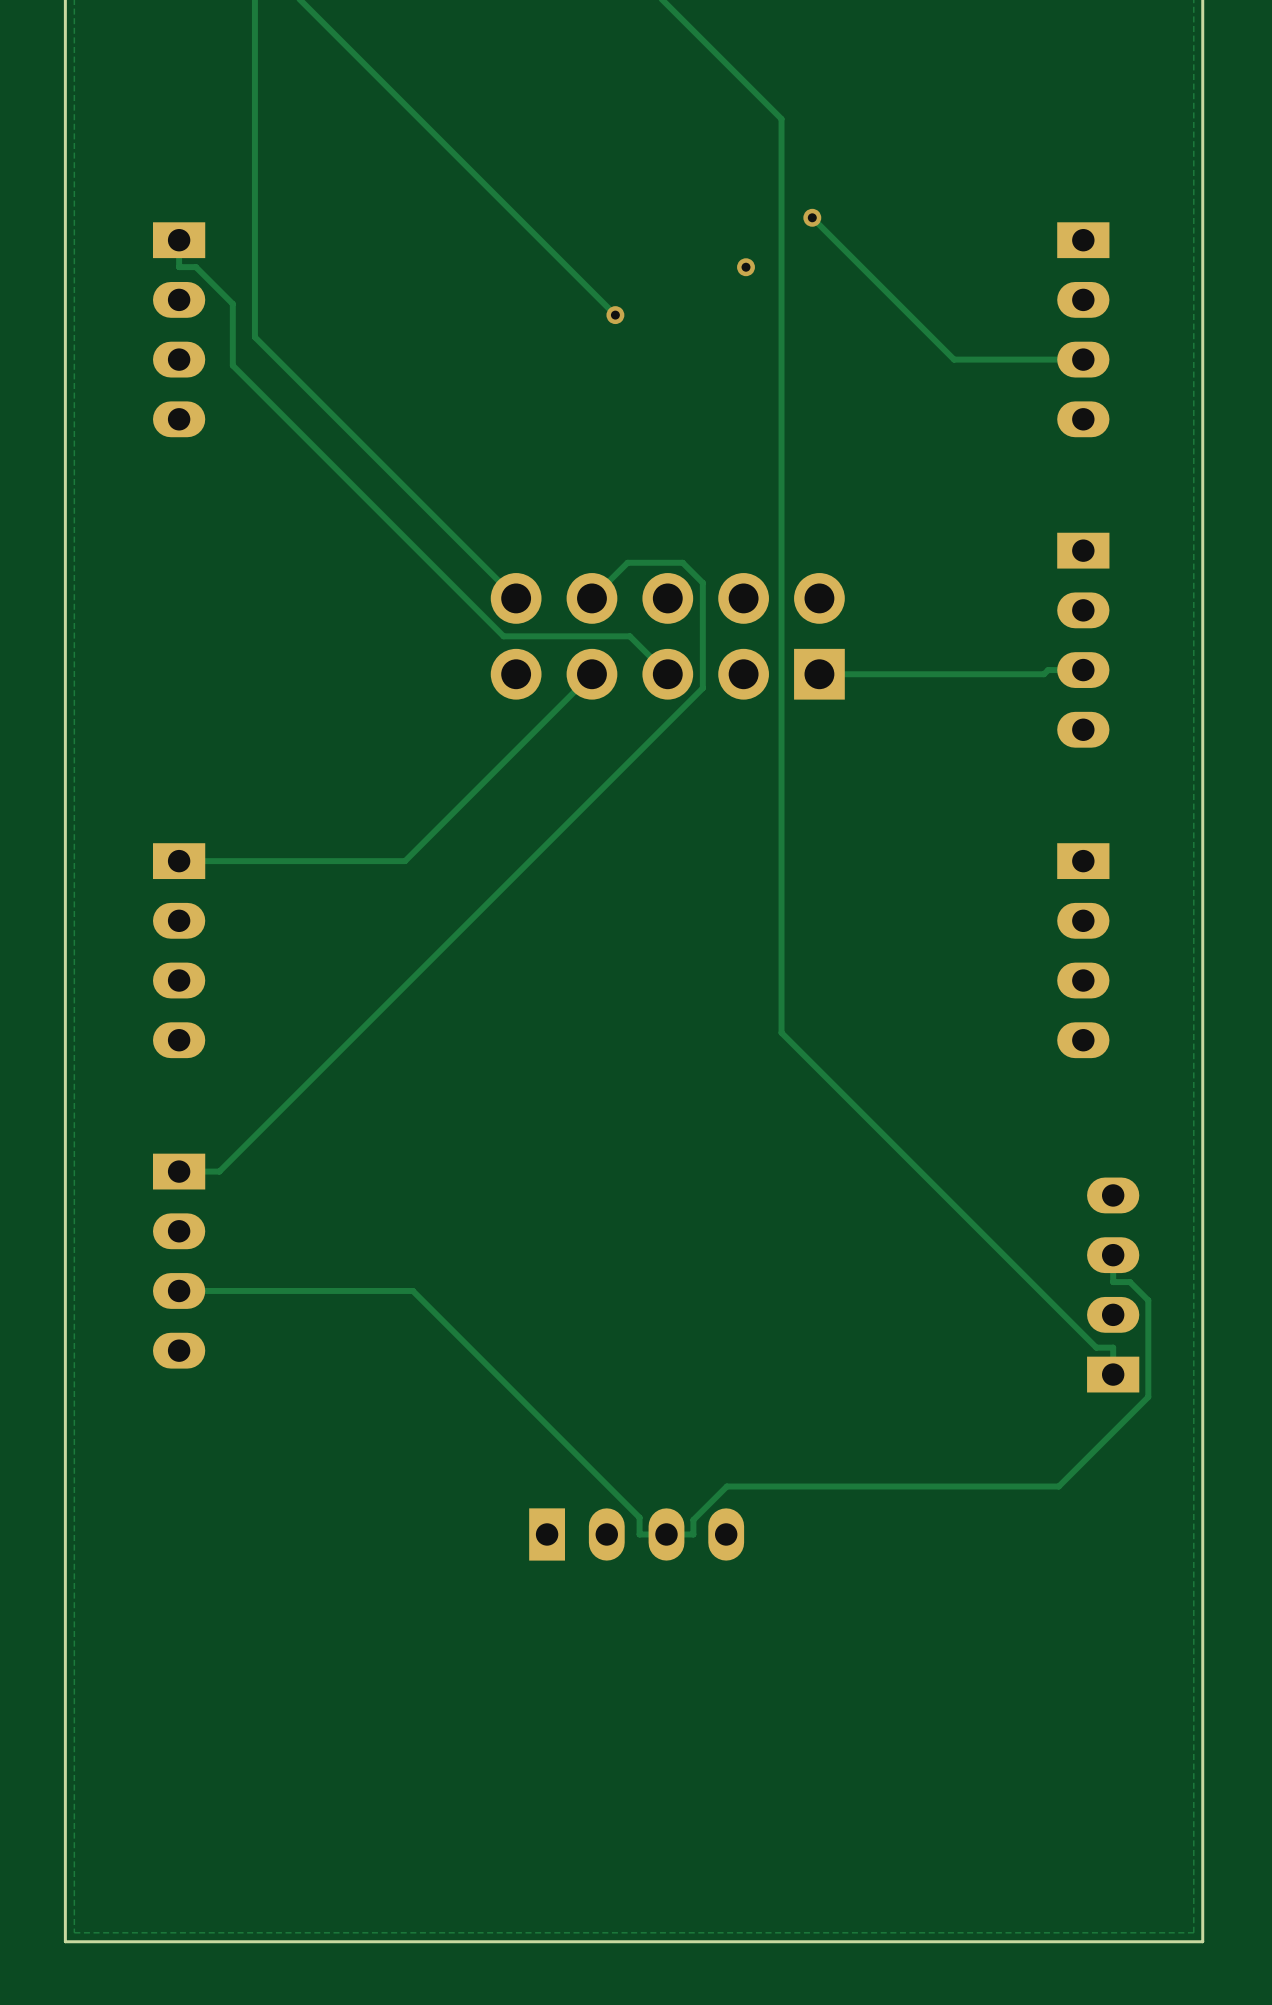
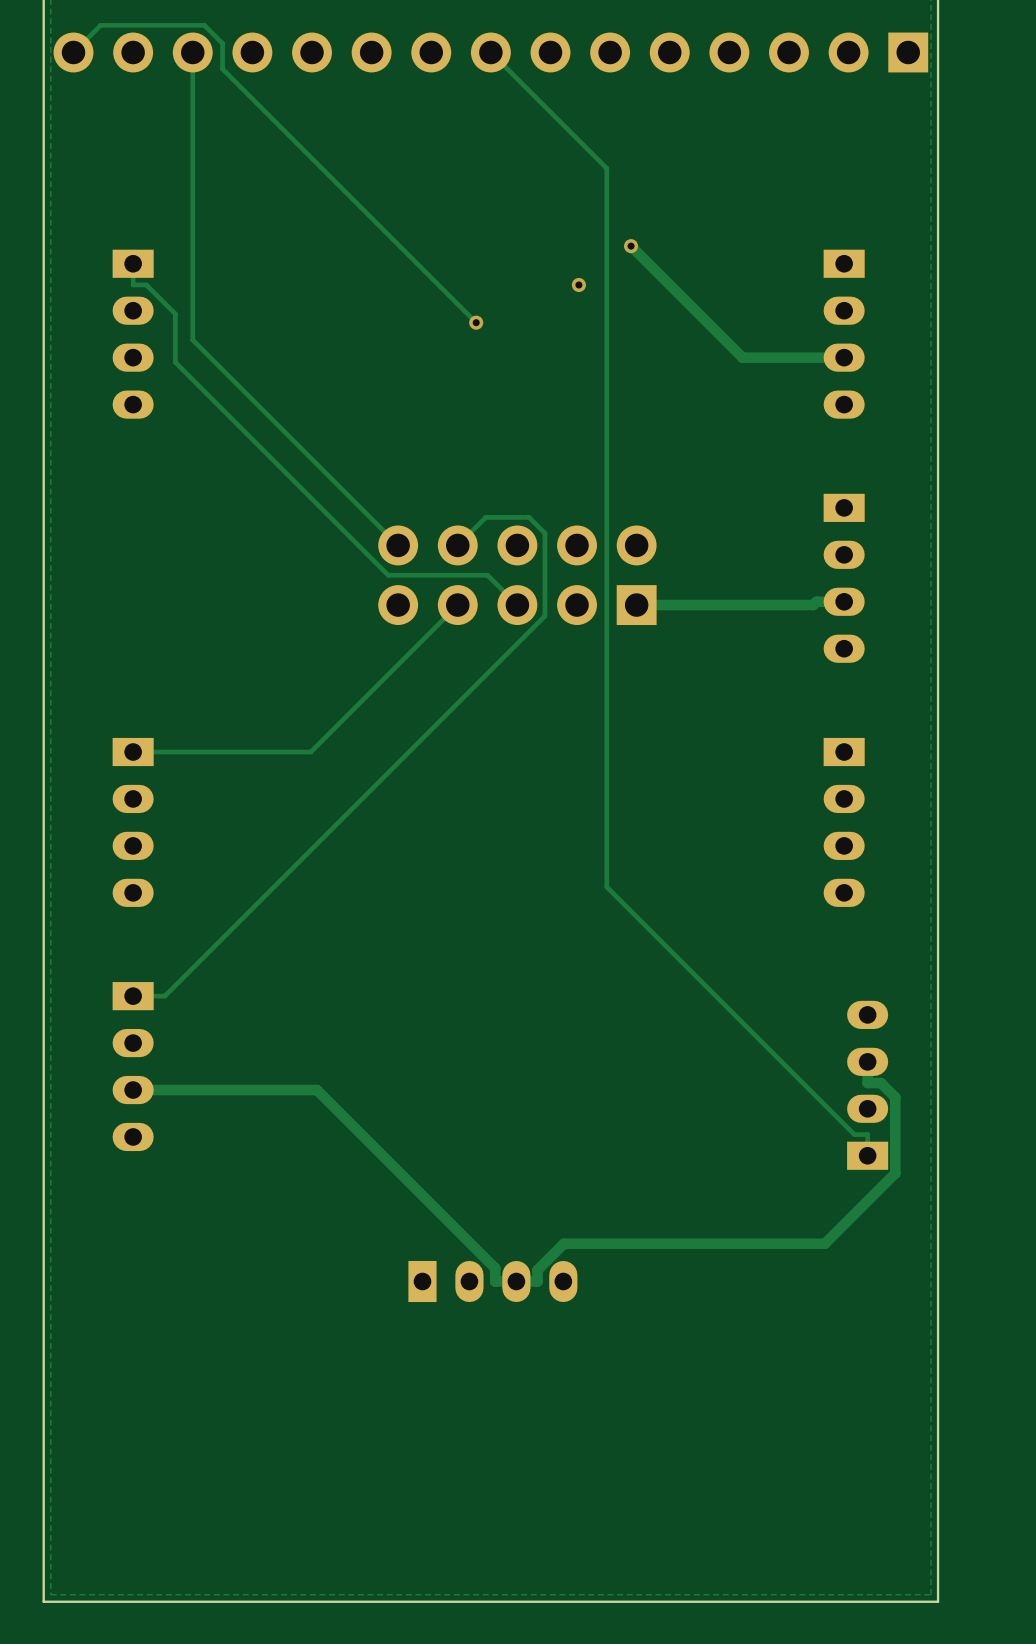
track width: thin (812, 217) (954, 359) (1083, 359) -> thick (631, 246) (742, 357) (844, 357)
track width: thin (1083, 670) (1048, 670) (1044, 674) (819, 674) -> thick (844, 601) (816, 601) (813, 605) (636, 605)
track width: thin (1113, 1255) (1113, 1282) (1130, 1282) (1148, 1300) (1148, 1397) (1058, 1486) (726, 1486) (693, 1519) (693, 1534) (639, 1534) (639, 1517) (412, 1290) (179, 1290) -> thick (867, 1061) (867, 1083) (880, 1083) (895, 1097) (895, 1173) (824, 1243) (563, 1243) (537, 1270) (537, 1281) (495, 1281) (495, 1268) (316, 1090) (133, 1090)

